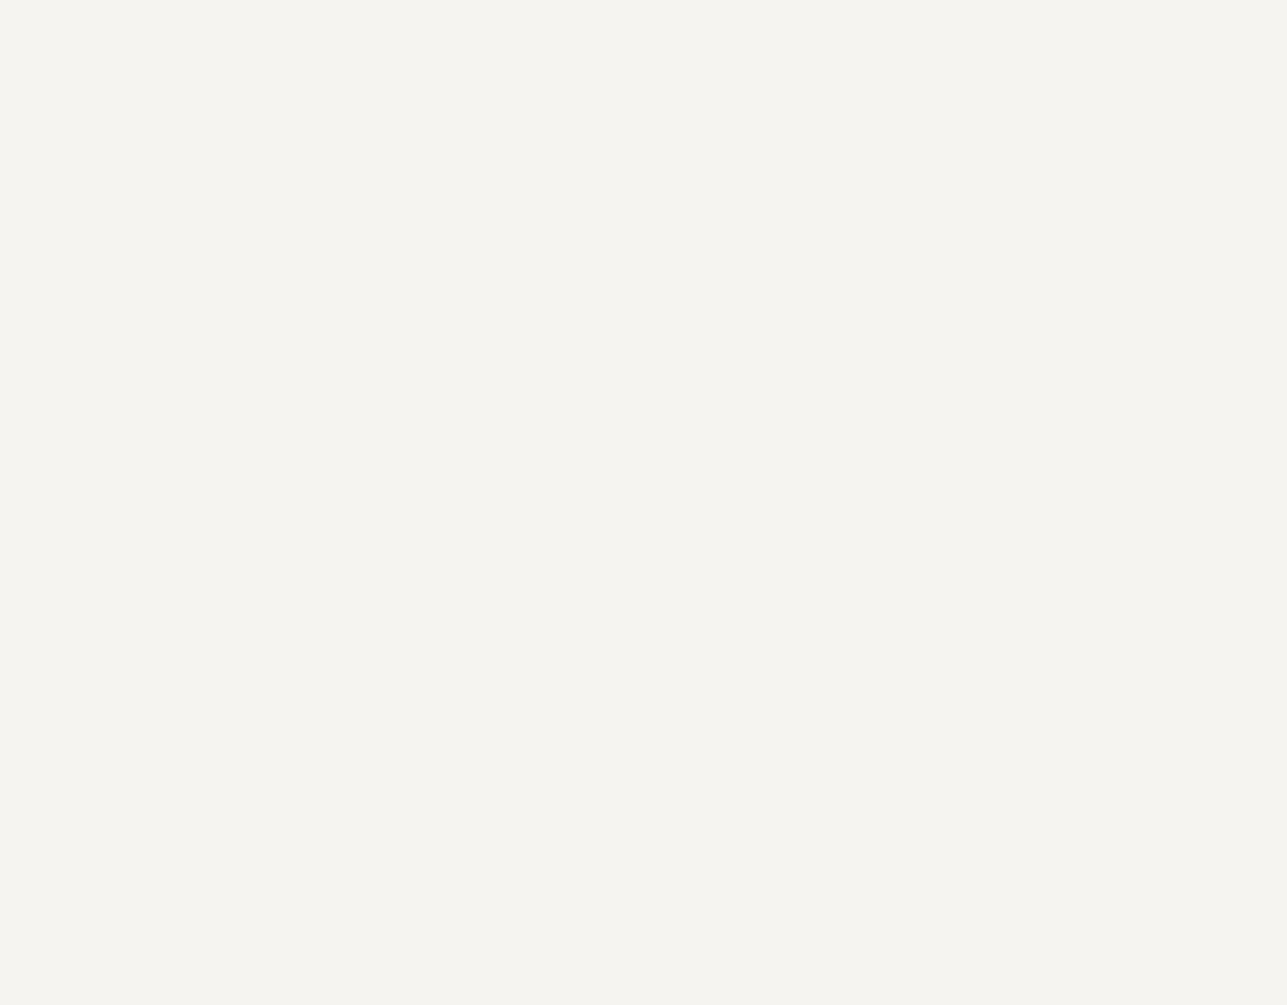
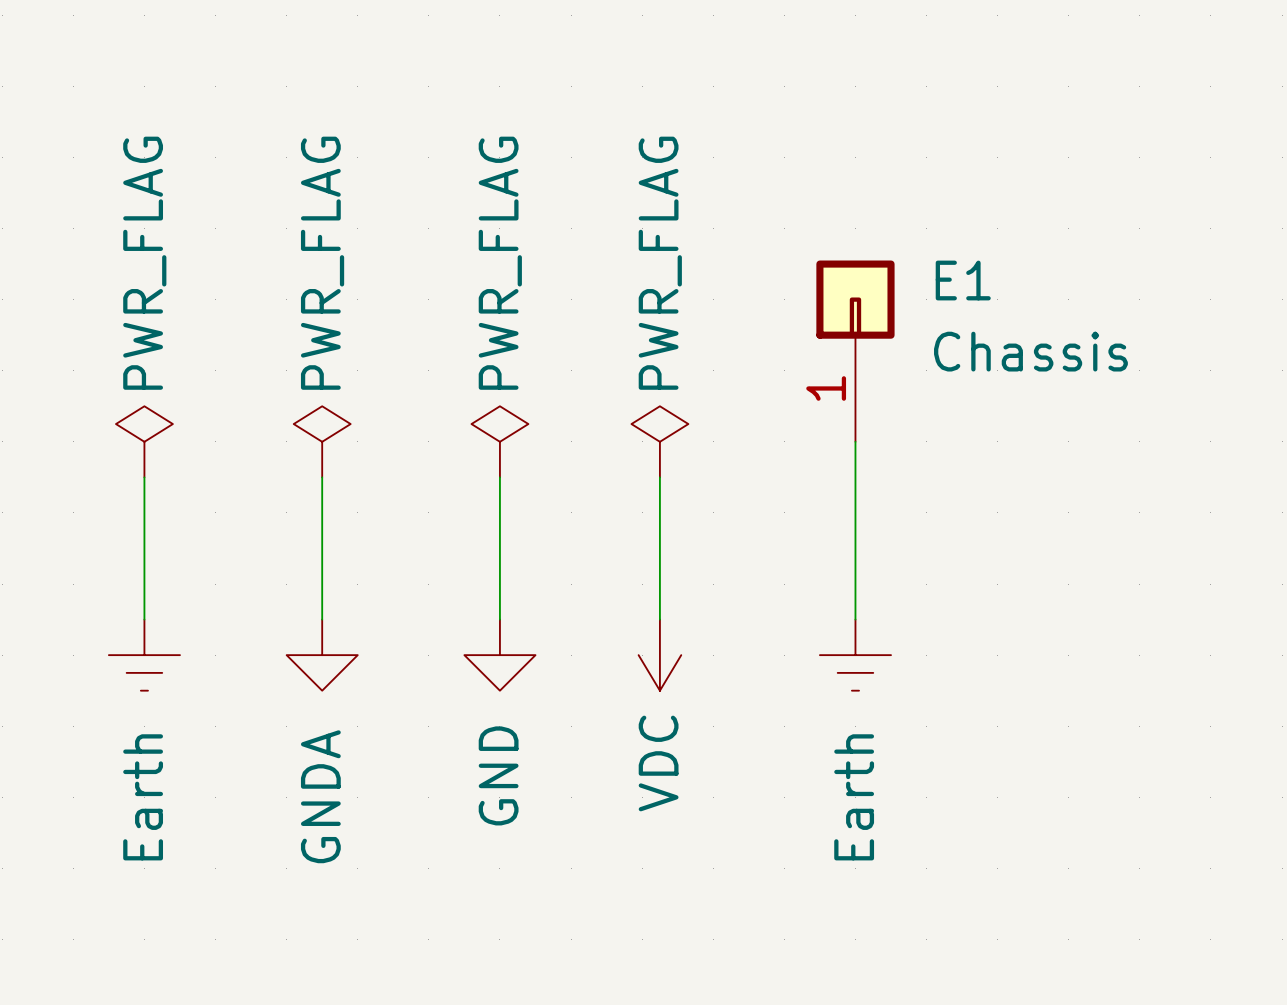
E1: none -> Chassis (855, 351)
power symbol: none -> PWR_FLAG (144, 441)
power symbol: none -> PWR_FLAG (322, 441)
power symbol: none -> PWR_FLAG (499, 441)
power symbol: none -> PWR_FLAG (659, 441)
wire: none -> (855, 441) (855, 619)
wire: none -> (144, 477) (144, 619)
wire: none -> (322, 477) (322, 619)
wire: none -> (499, 477) (499, 619)
wire: none -> (659, 477) (659, 619)
power symbol: none -> Earth (144, 655)
power symbol: none -> GNDA (322, 655)
power symbol: none -> GND (499, 655)
power symbol: none -> VDC (659, 655)
power symbol: none -> Earth (855, 655)

